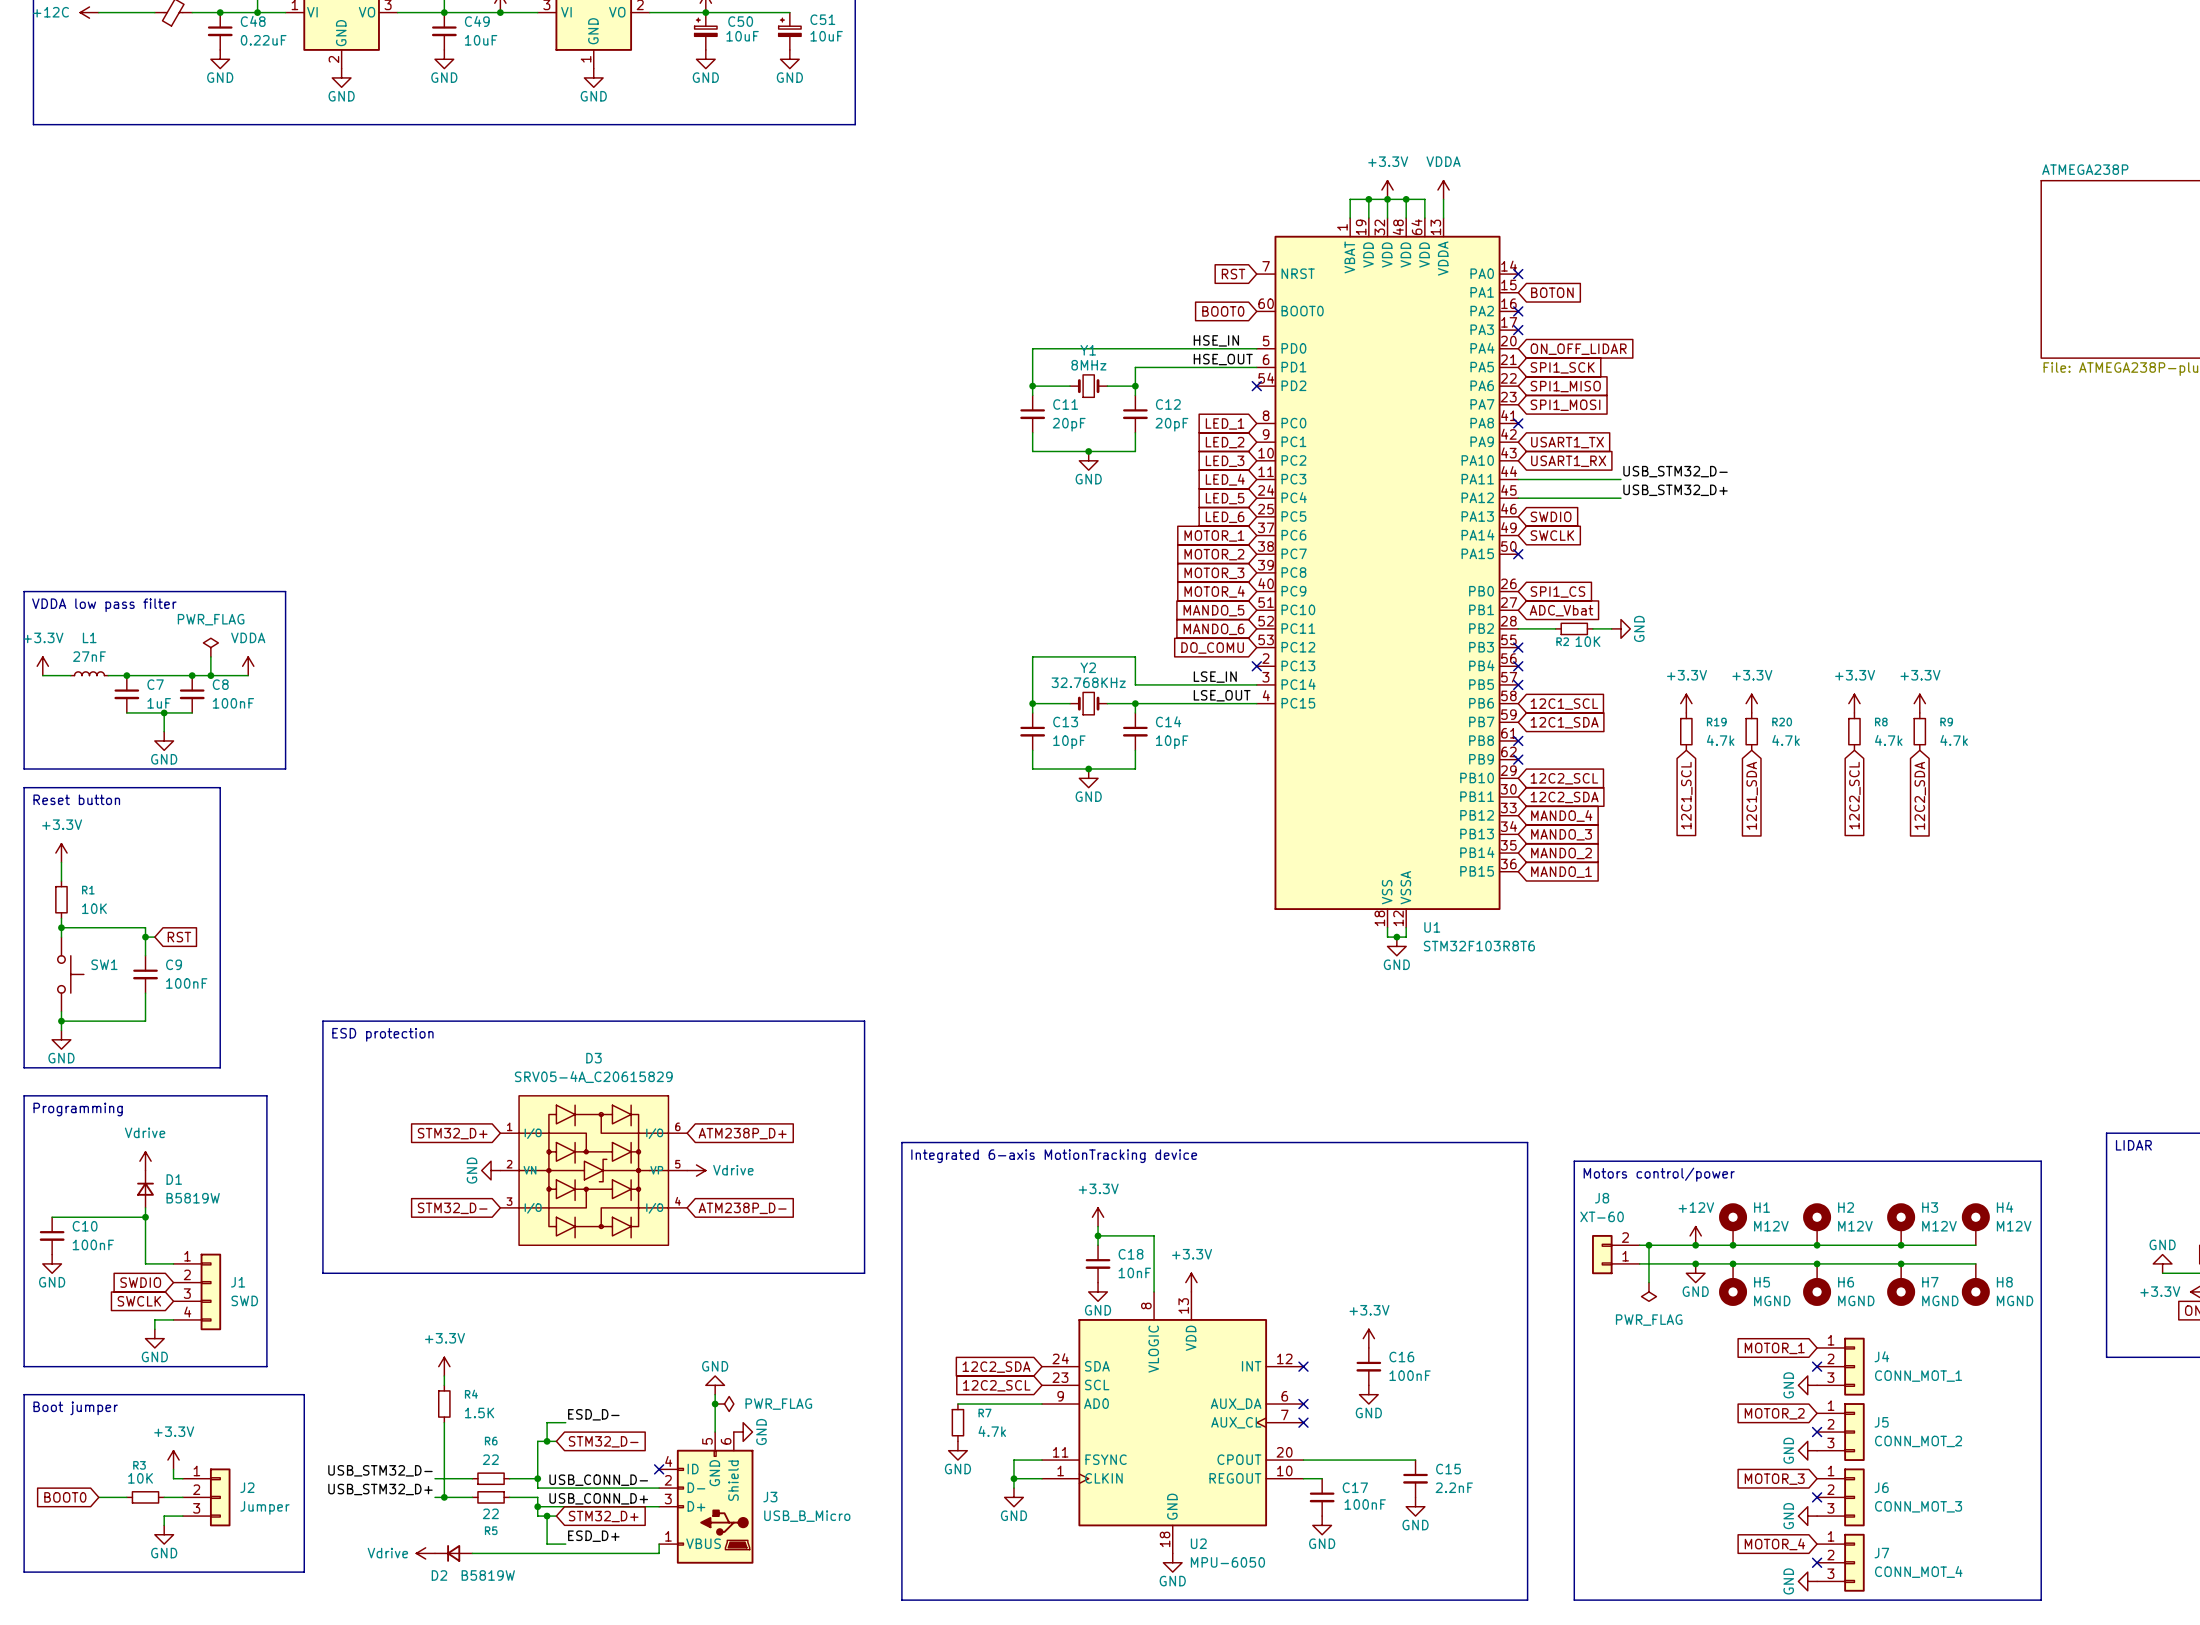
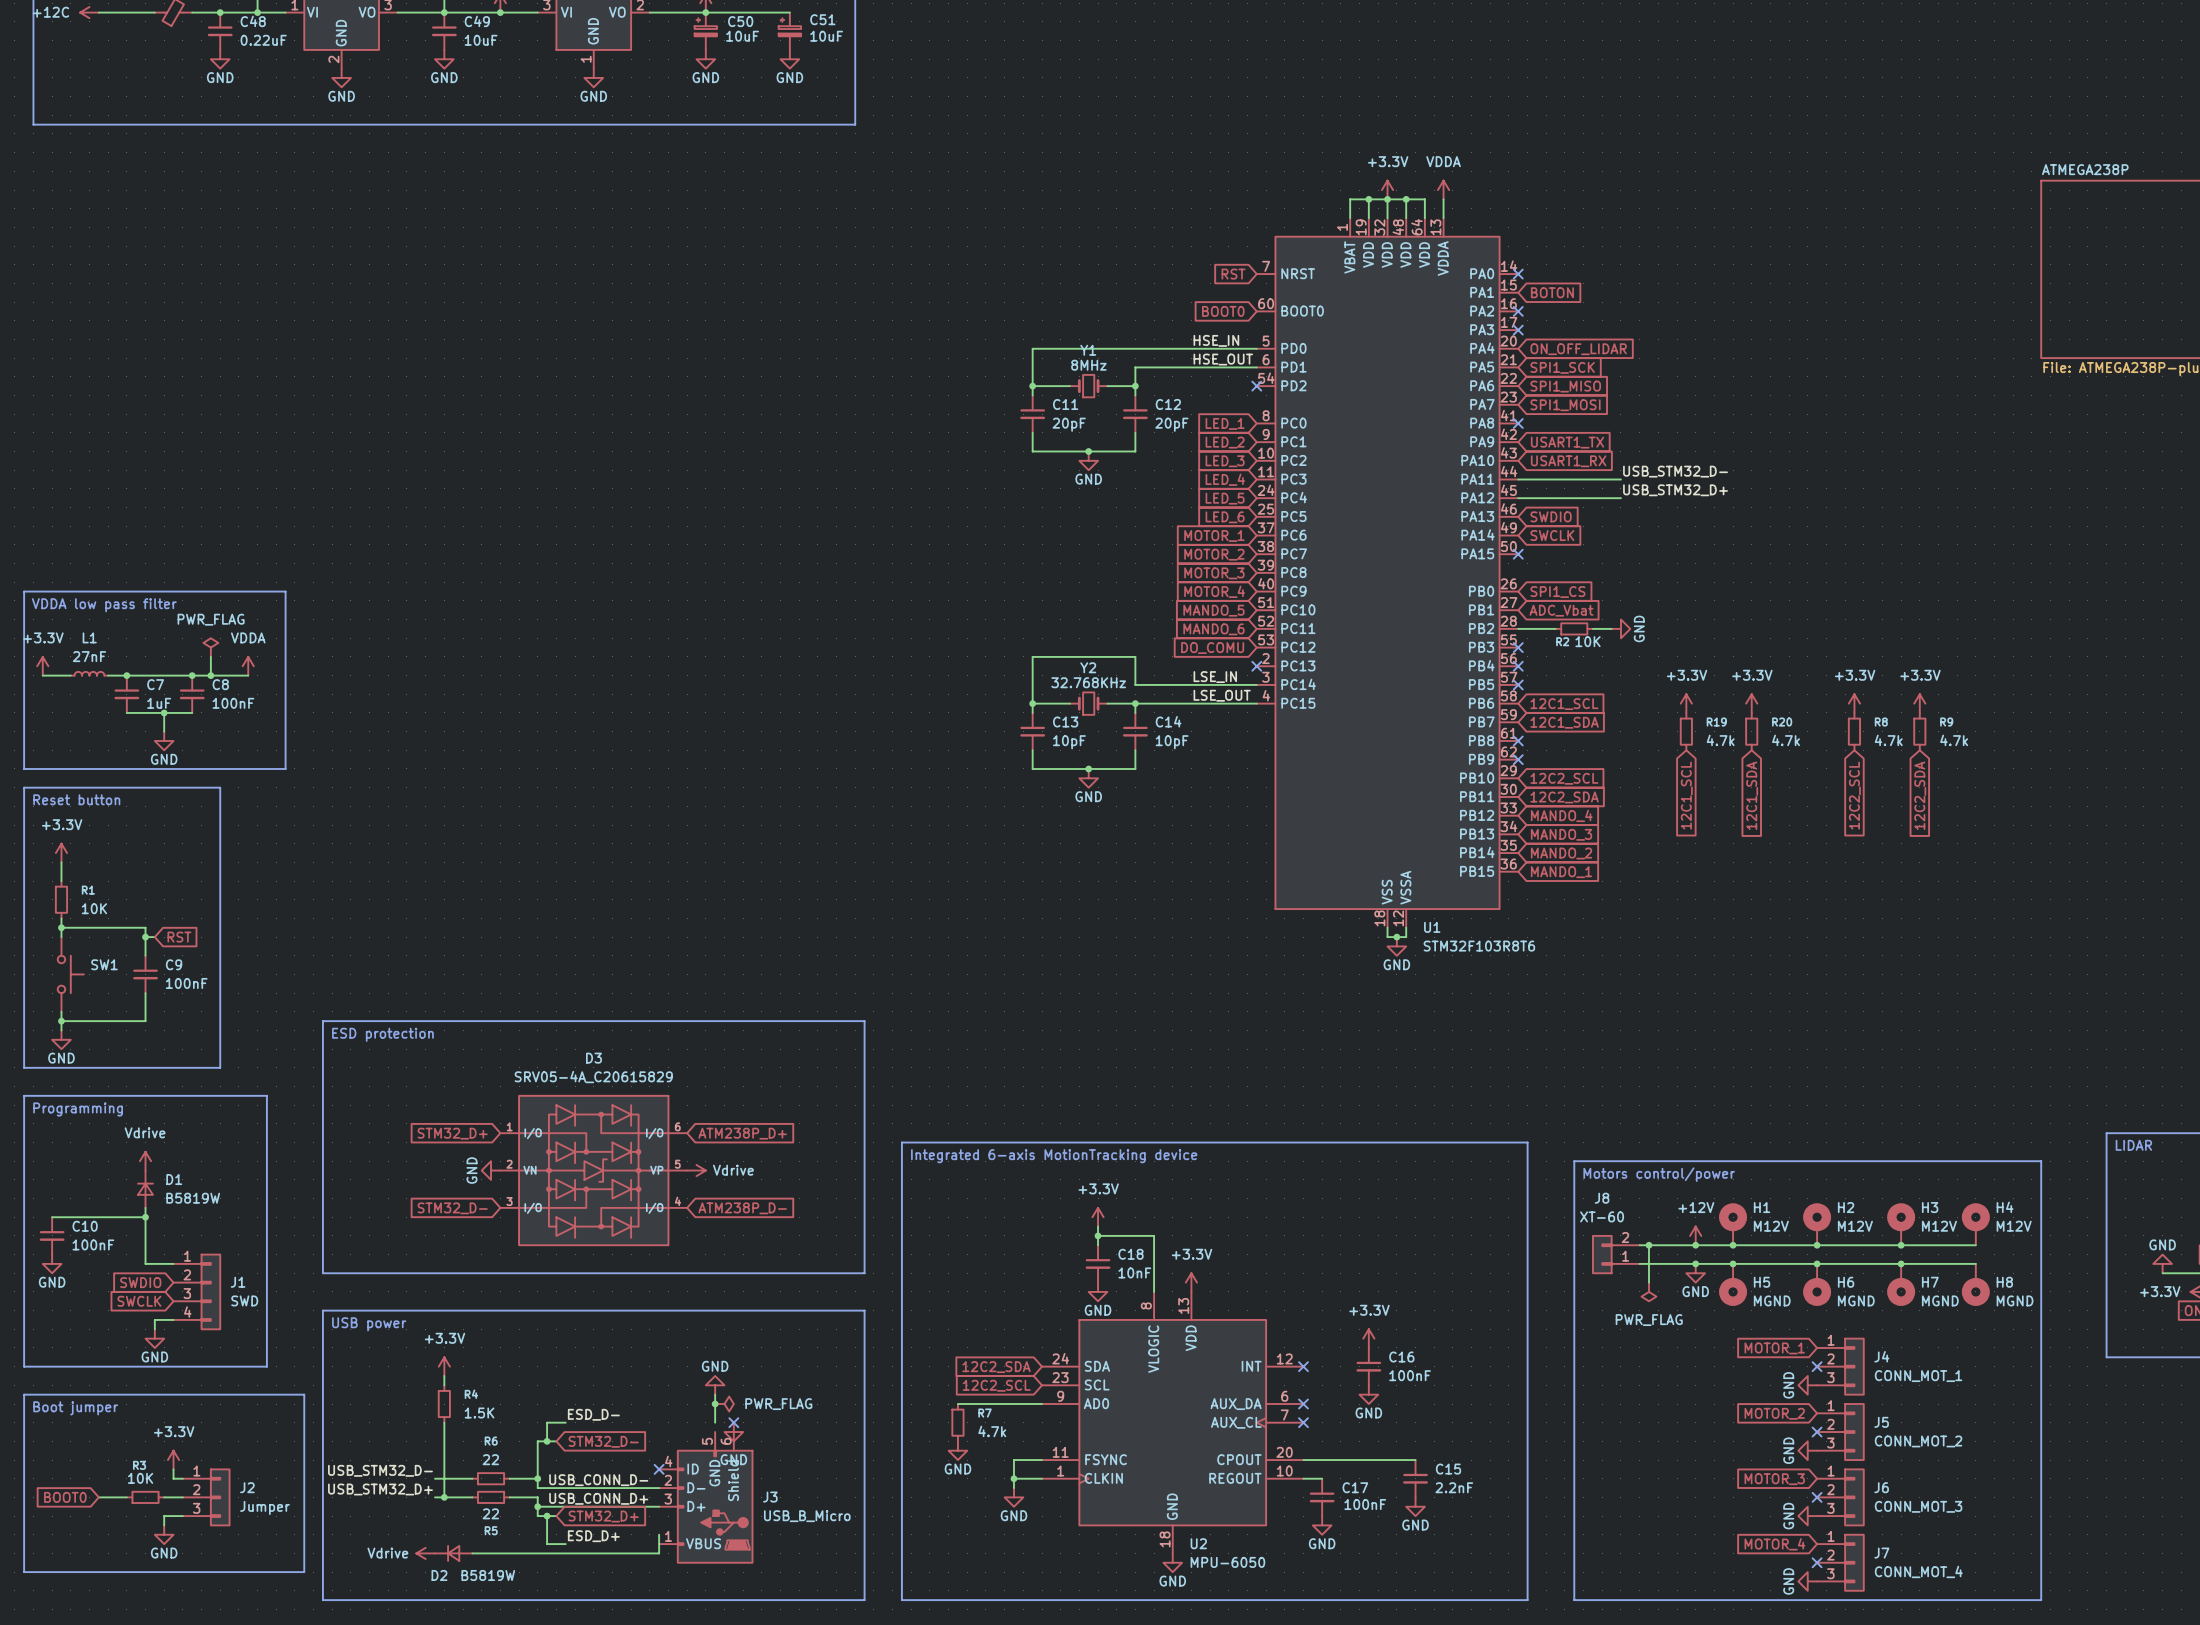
line: none -> (322, 1310) (864, 1310) (864, 1600) (322, 1600) (322, 1310)
text: none -> USB power (369, 1324)
wire: (715, 1422) (715, 1432) -> (659, 1534) (659, 1544)
no-connect mark: none -> (733, 1422)
power symbol rotation: 0° (743, 1432) -> 90° clockwise (733, 1432)

